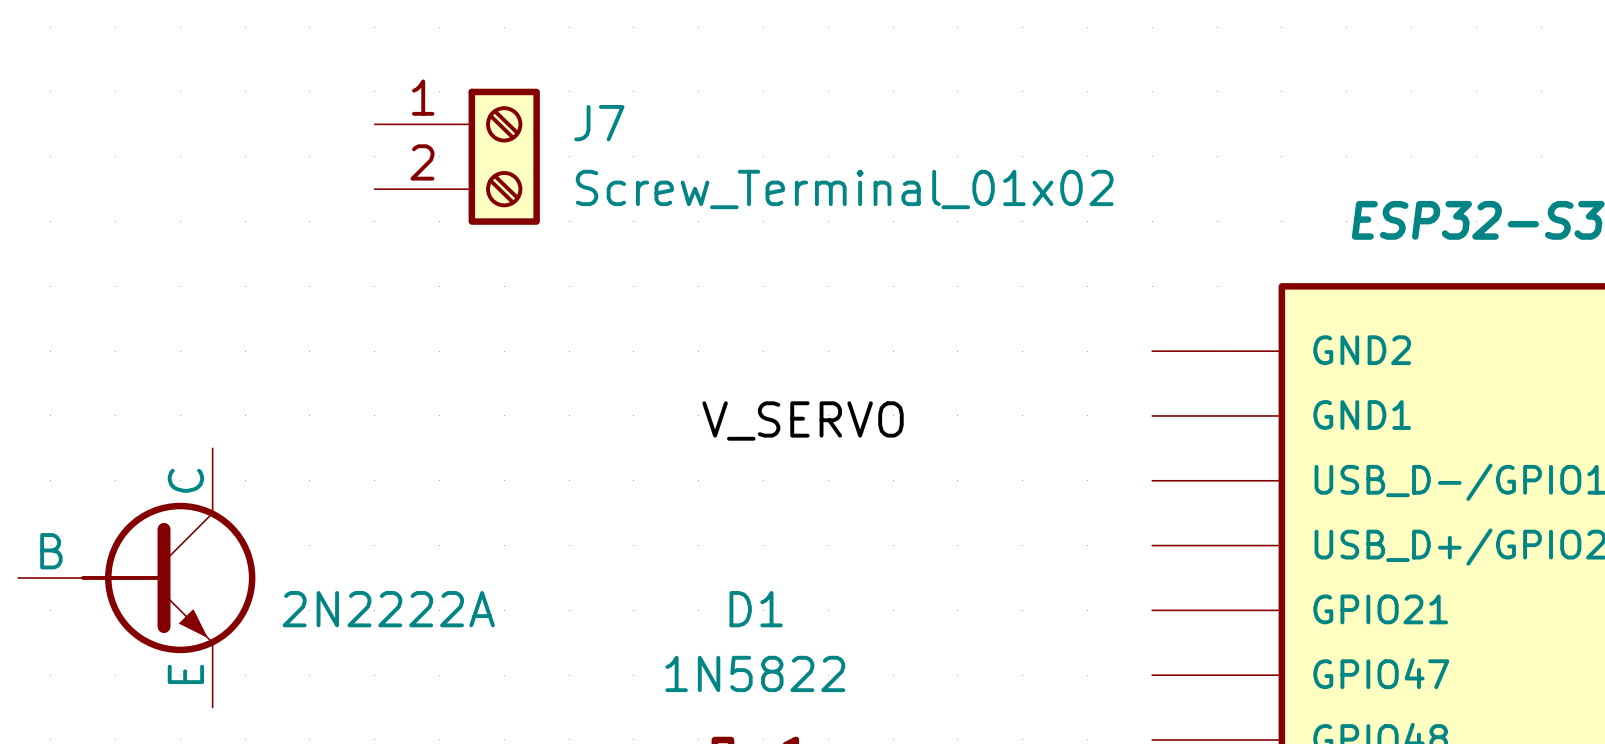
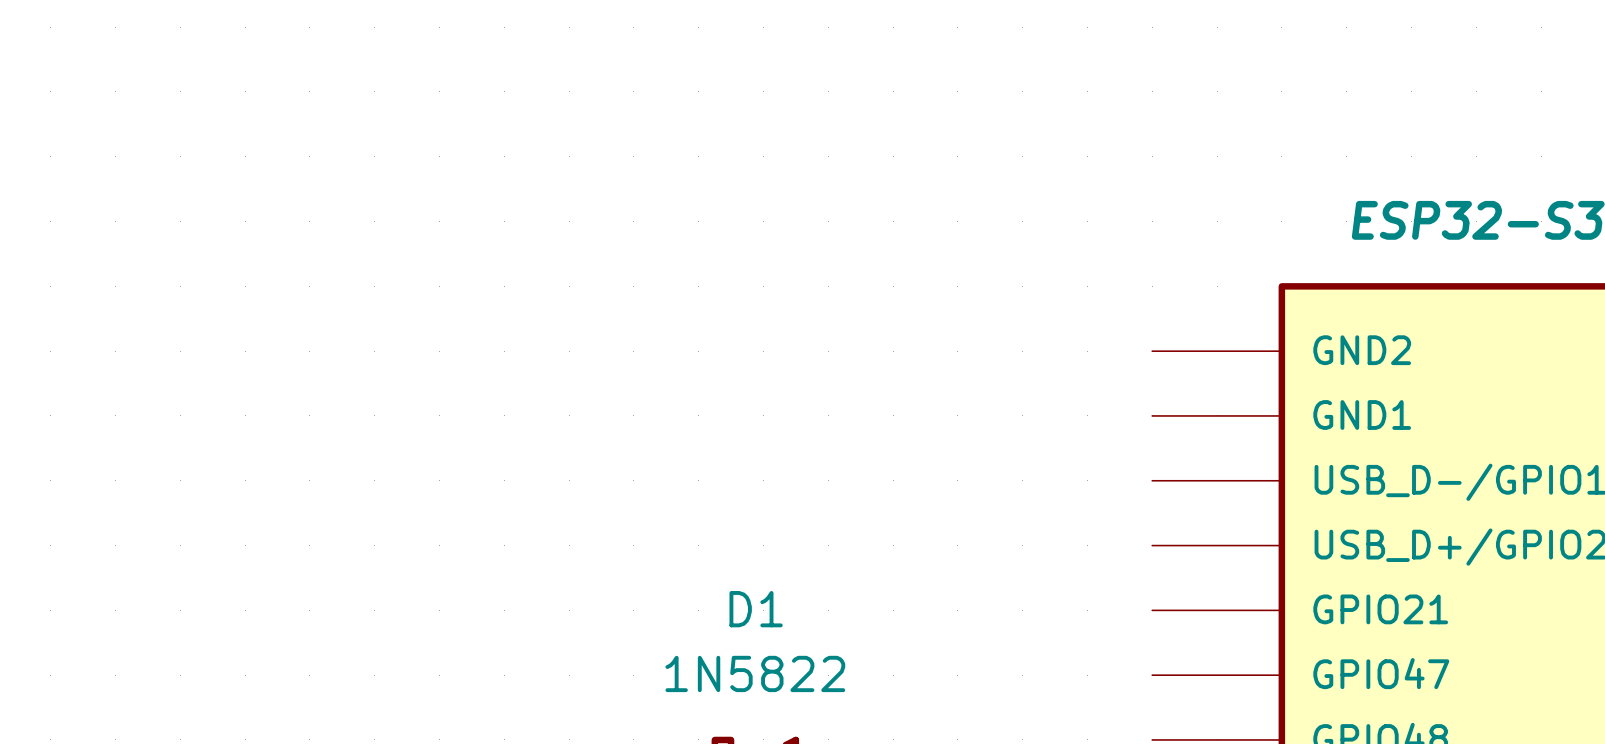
J7: Screw_Terminal_01x02 (457, 156) -> none
label: V_SERVO (803, 421) -> none
part: 2N2222A (136, 577) -> none

